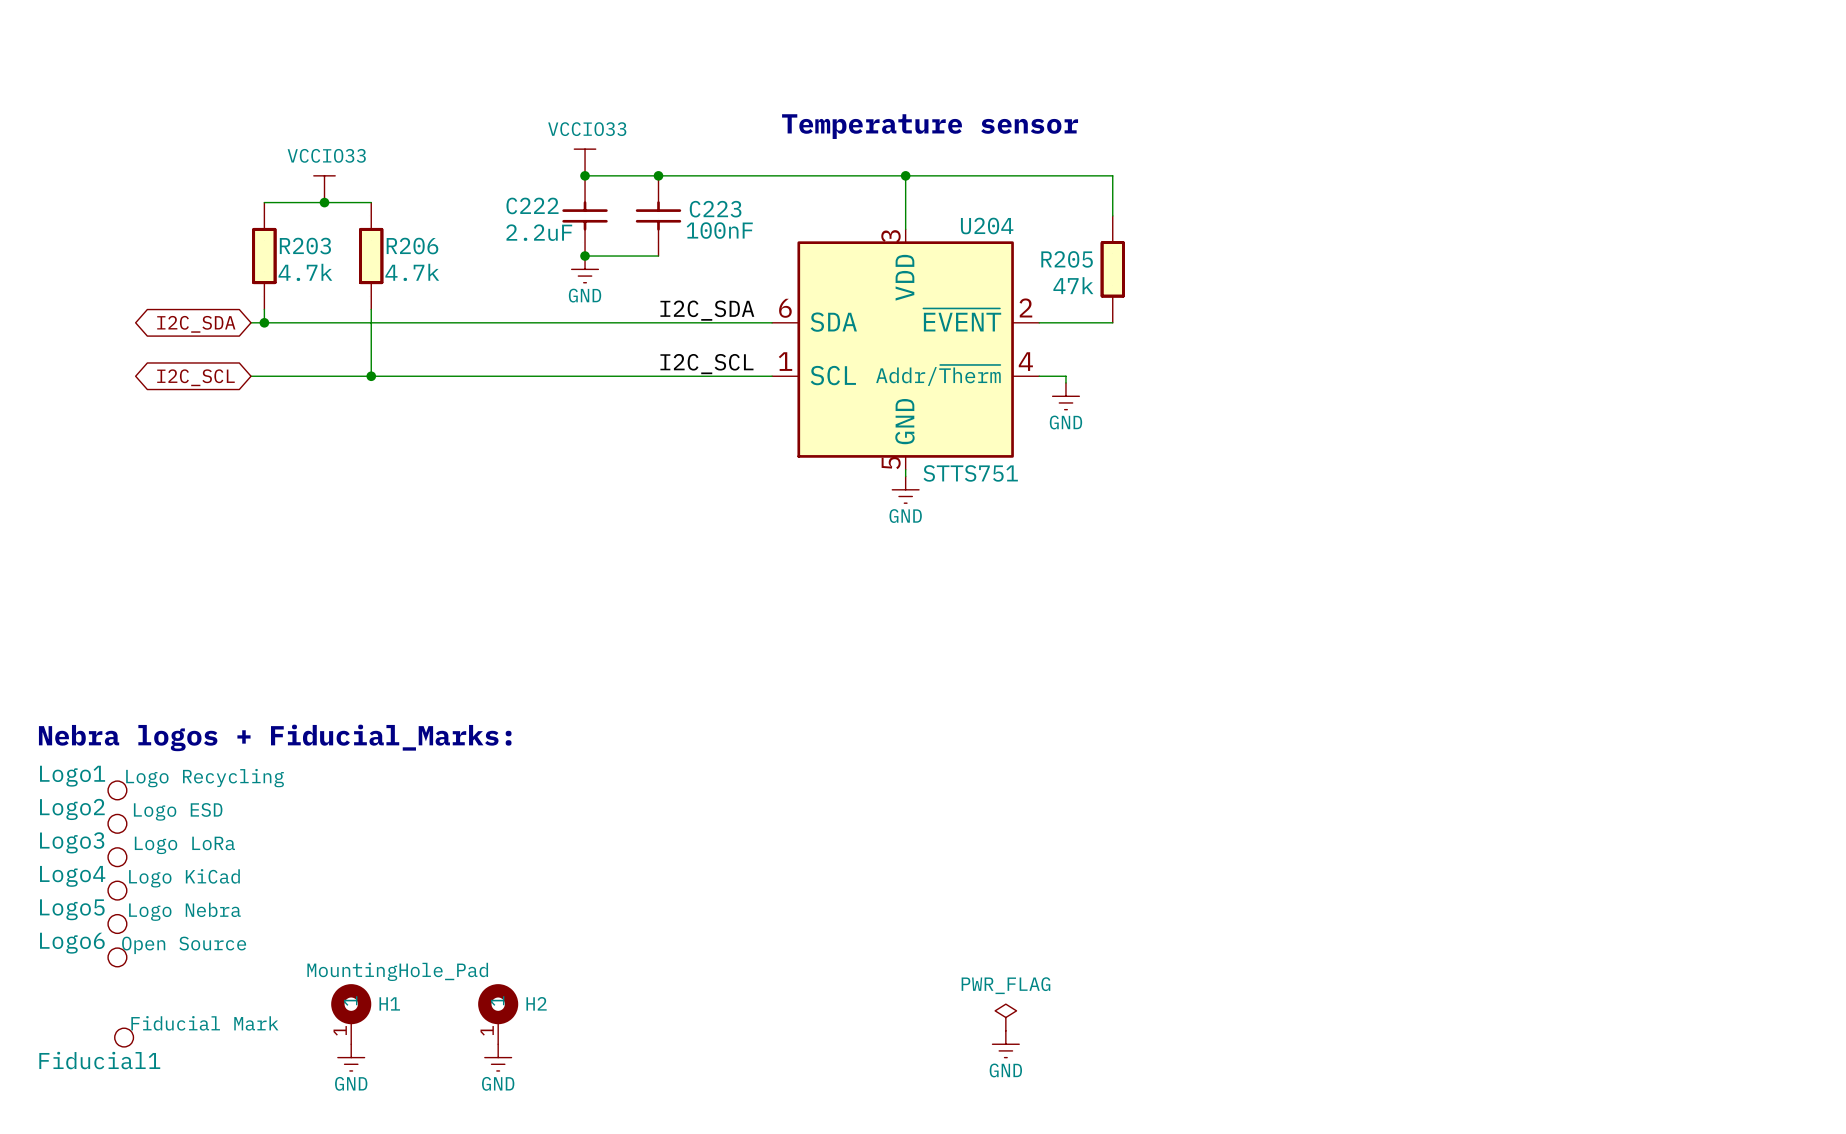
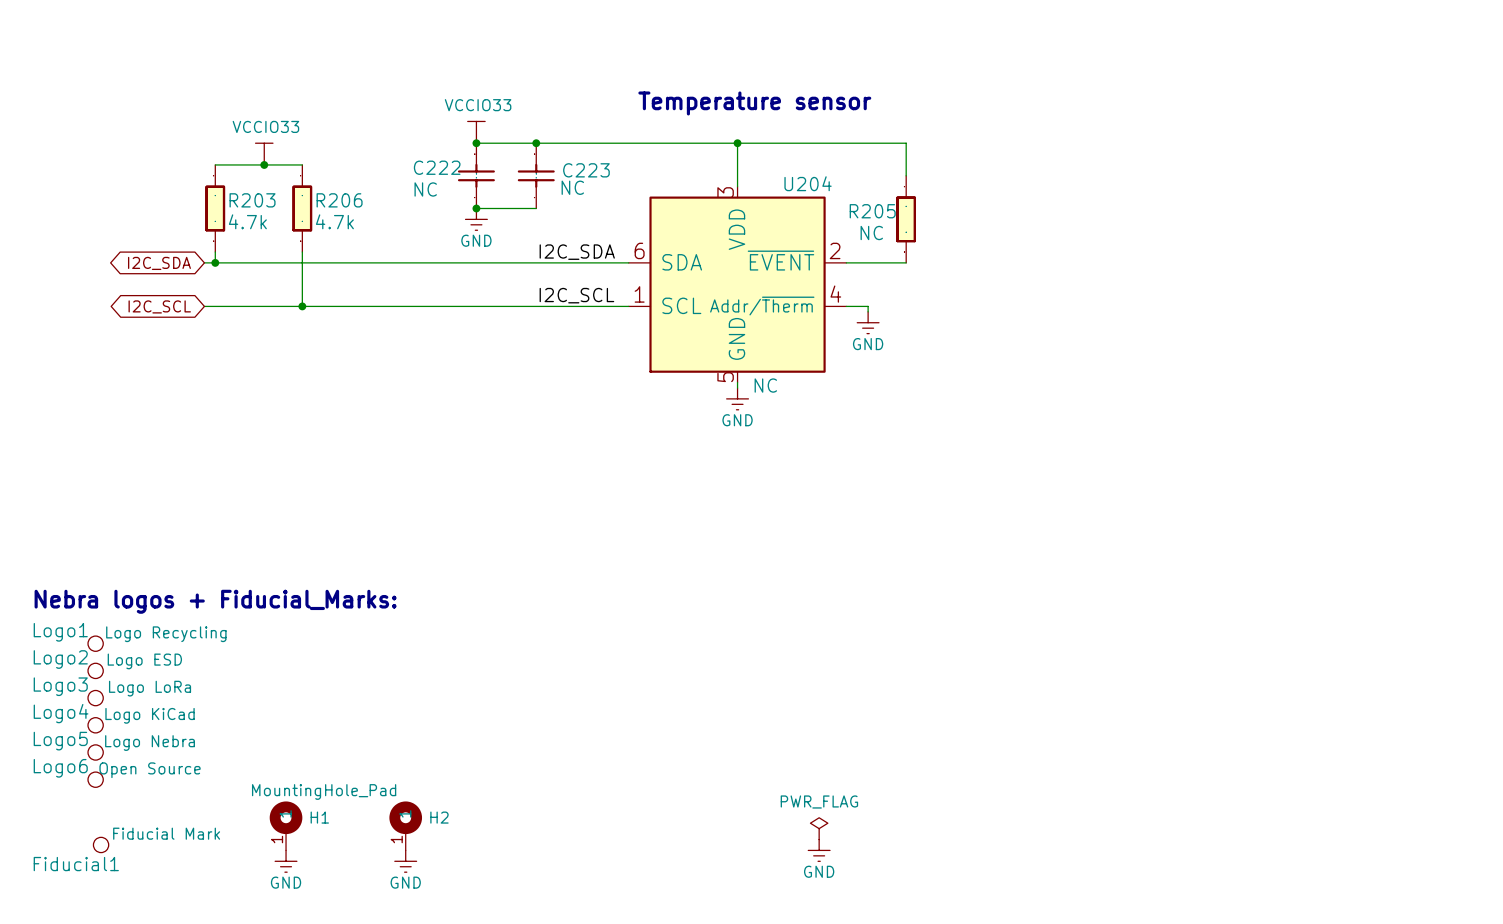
C223 value: 100nF (719, 230) -> NC (572, 187)
C222 value: 2.2uF (539, 232) -> NC (425, 189)
R205 value: 47k (1073, 285) -> NC (871, 233)
U204 value: STTS751 (970, 473) -> NC (765, 385)

